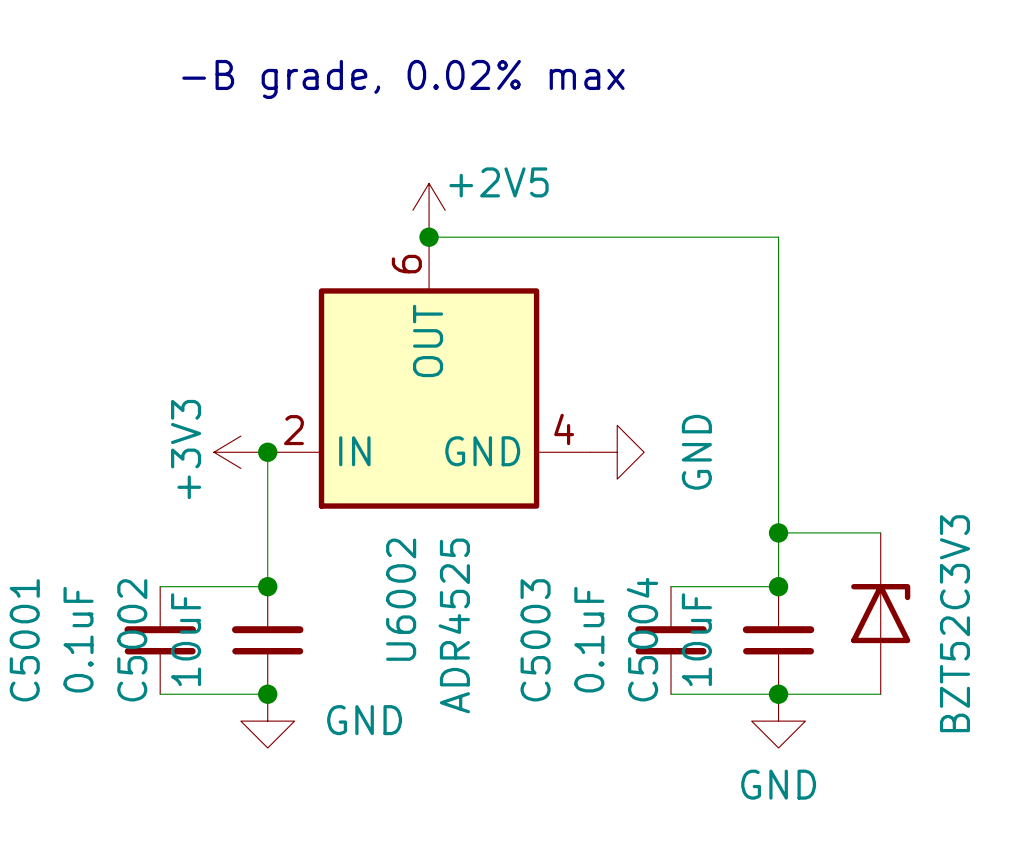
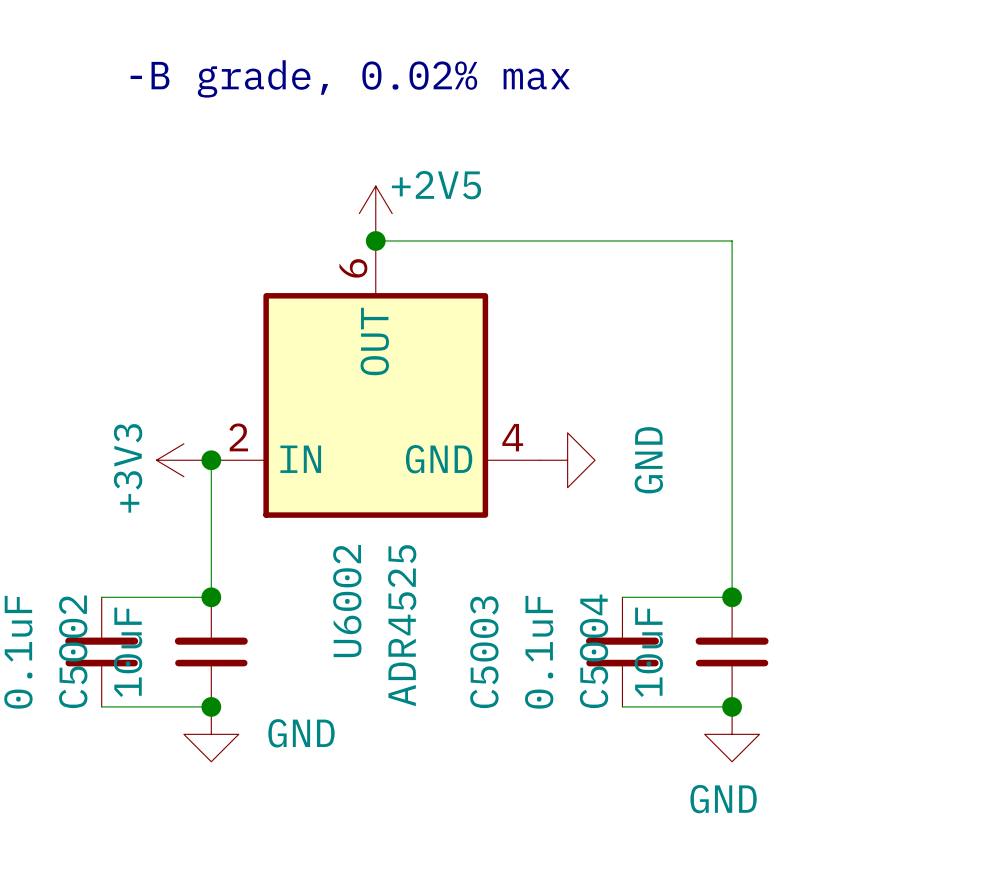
wire: (778, 532) (880, 532) -> none
junction: (778, 532) -> none
part: BZT52C3V3 (880, 613) -> none
wire: (778, 694) (880, 694) -> none

